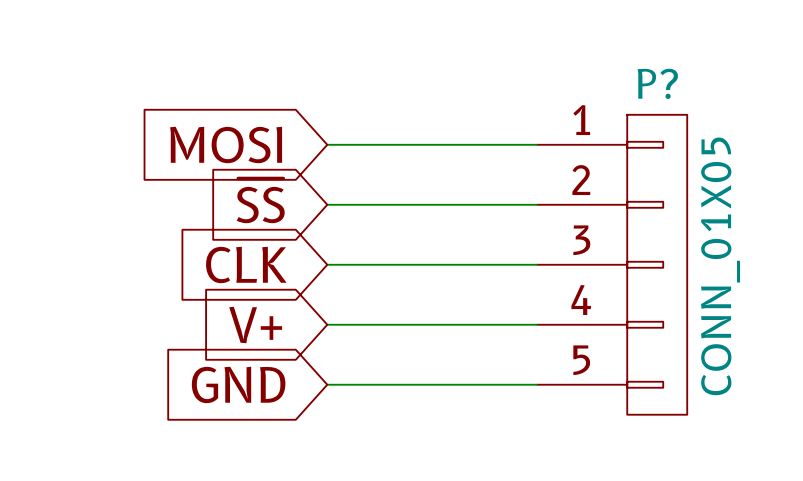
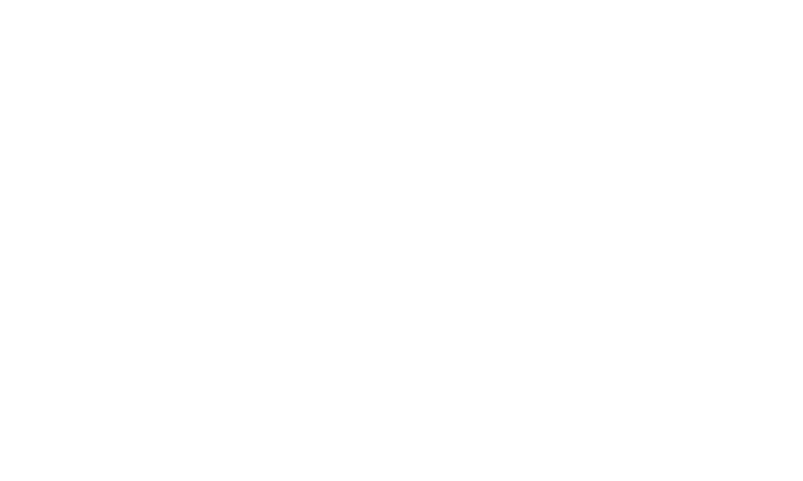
wire: (327, 144) (537, 144) -> none
global label: MOSI (226, 145) -> none
global label: ~{SS} (260, 200) -> none
wire: (327, 204) (537, 204) -> none
global label: CLK (246, 264) -> none
wire: (327, 264) (537, 264) -> none
P?: CONN_01X05 (612, 264) -> none
global label: V+ (255, 324) -> none
wire: (327, 324) (537, 324) -> none
global label: GND (238, 384) -> none
wire: (327, 384) (537, 384) -> none

